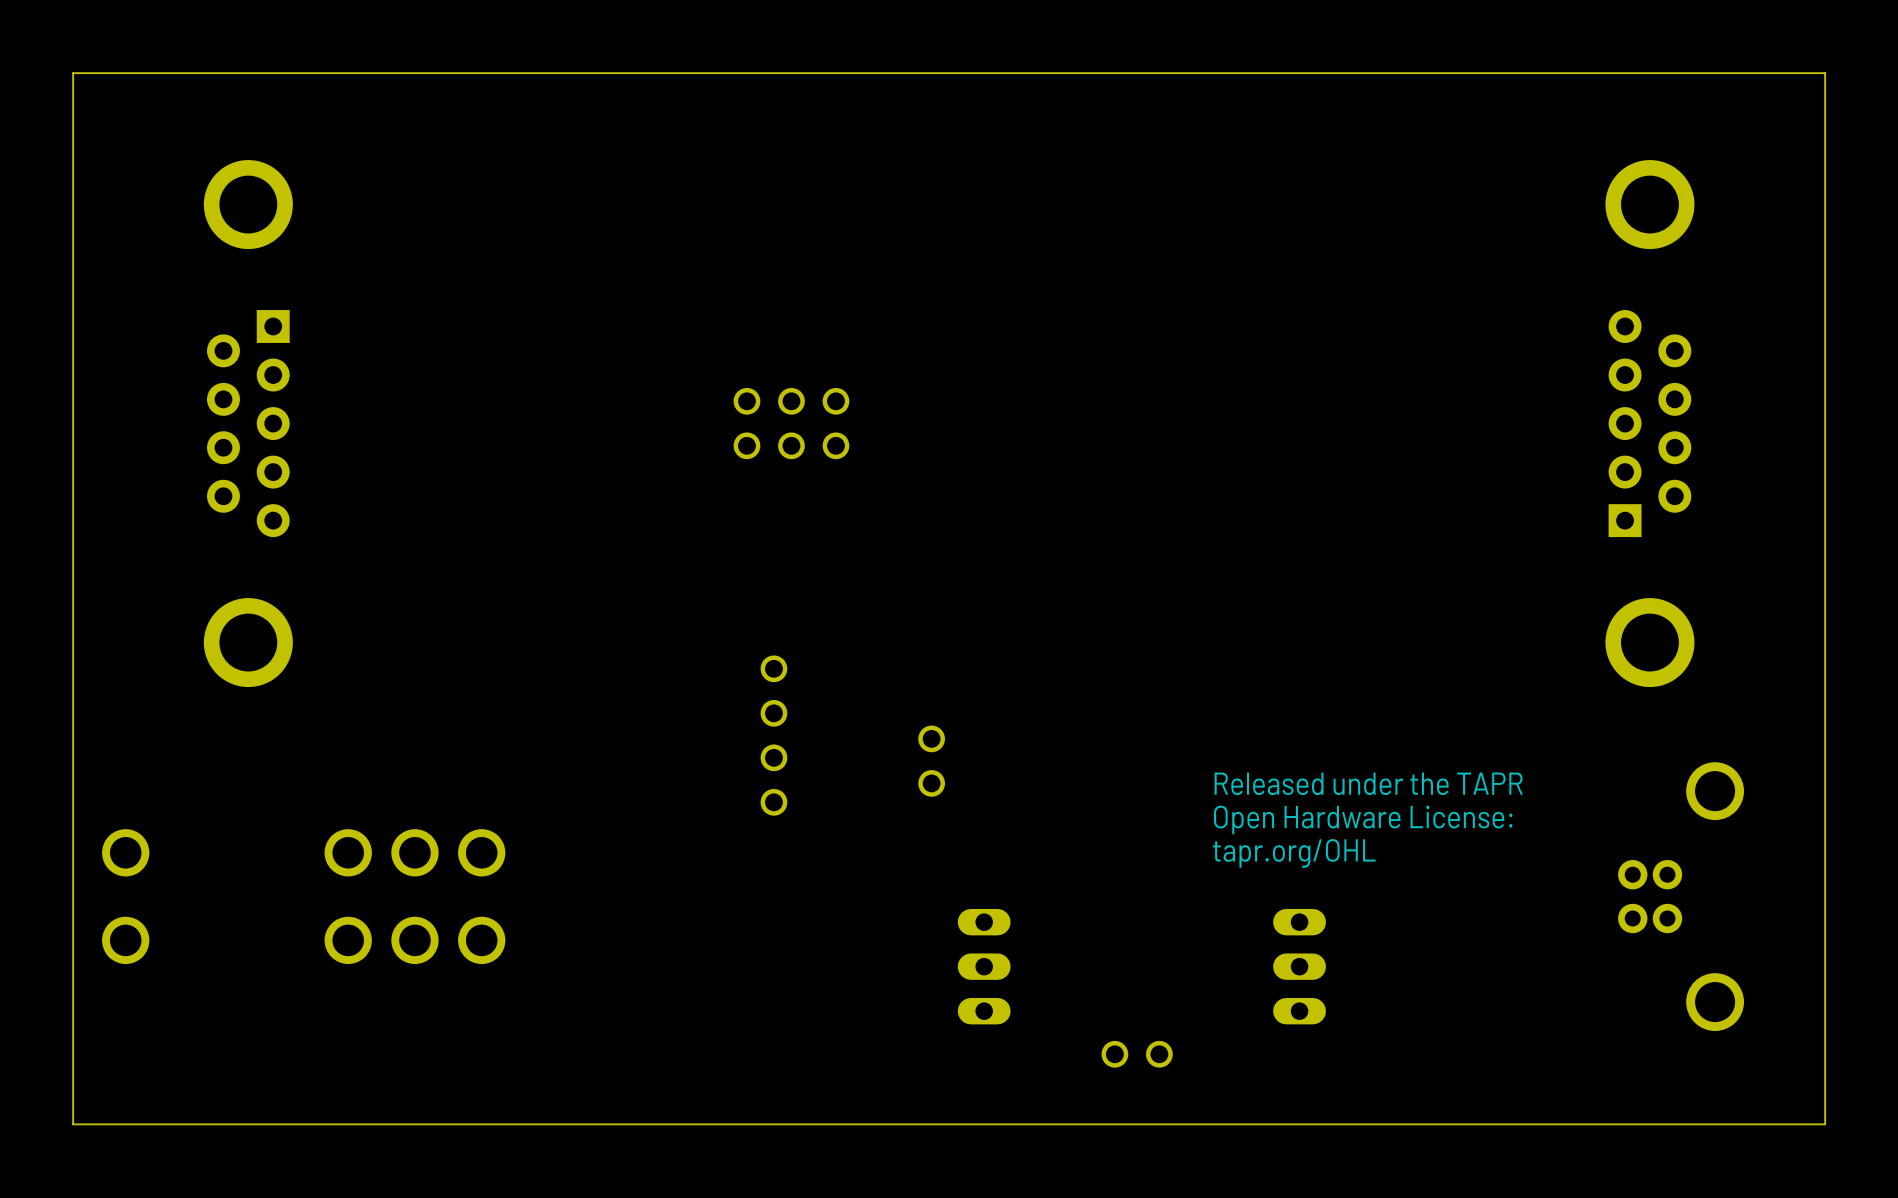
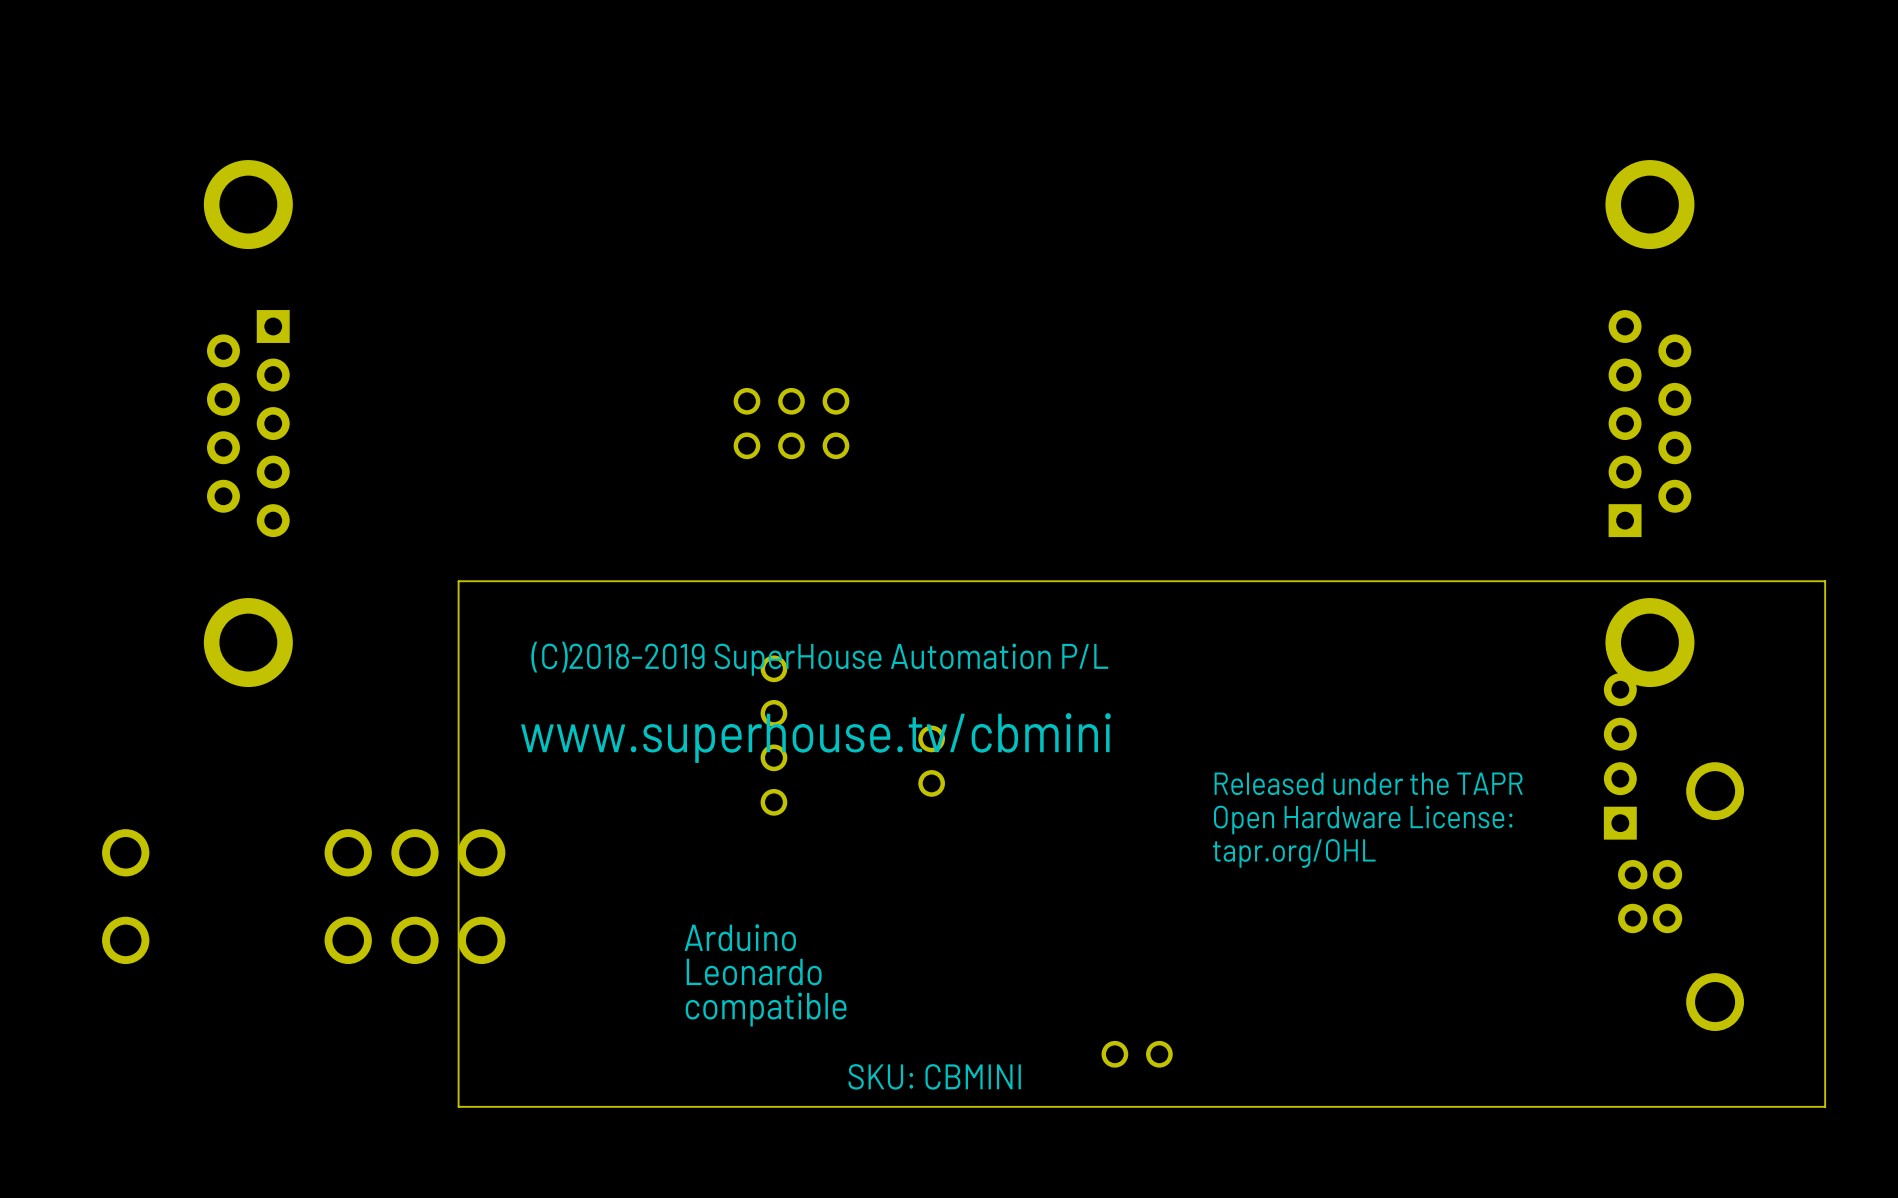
board edge: (1825, 581) (1825, 73) (73, 73) (73, 1124) (1825, 1124) (1825, 1106) -> (1825, 581) (458, 581) (458, 1106) (1825, 1106)
text: none -> (C)2018-2019 SuperHouse Automation P/L (819, 658)
text: none -> www.superhouse.tv/cbmini (815, 738)
part: none -> (1620, 756)
text: none -> Arduino (740, 937)
part: (984, 966) -> none
part: (1299, 966) -> none
text: none -> Leonardo (754, 972)
text: none -> compatible (766, 1009)
text: none -> SKU: CBMINI (934, 1076)

